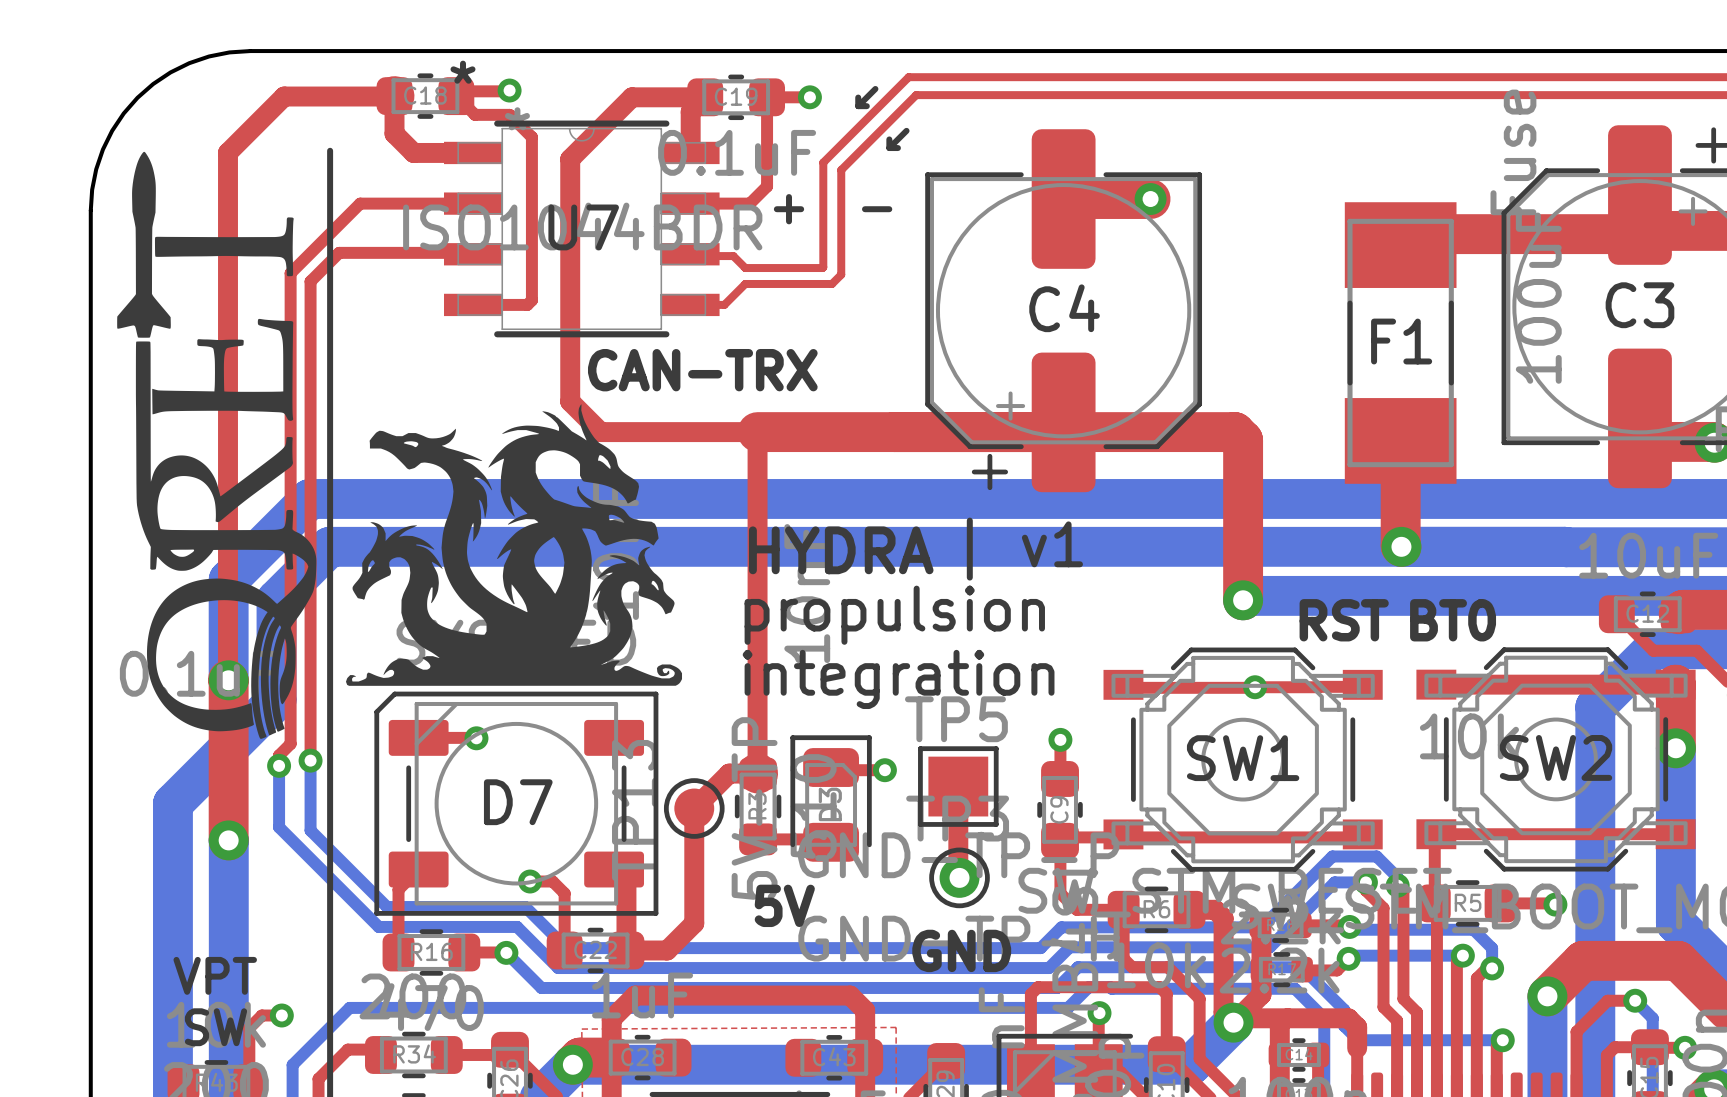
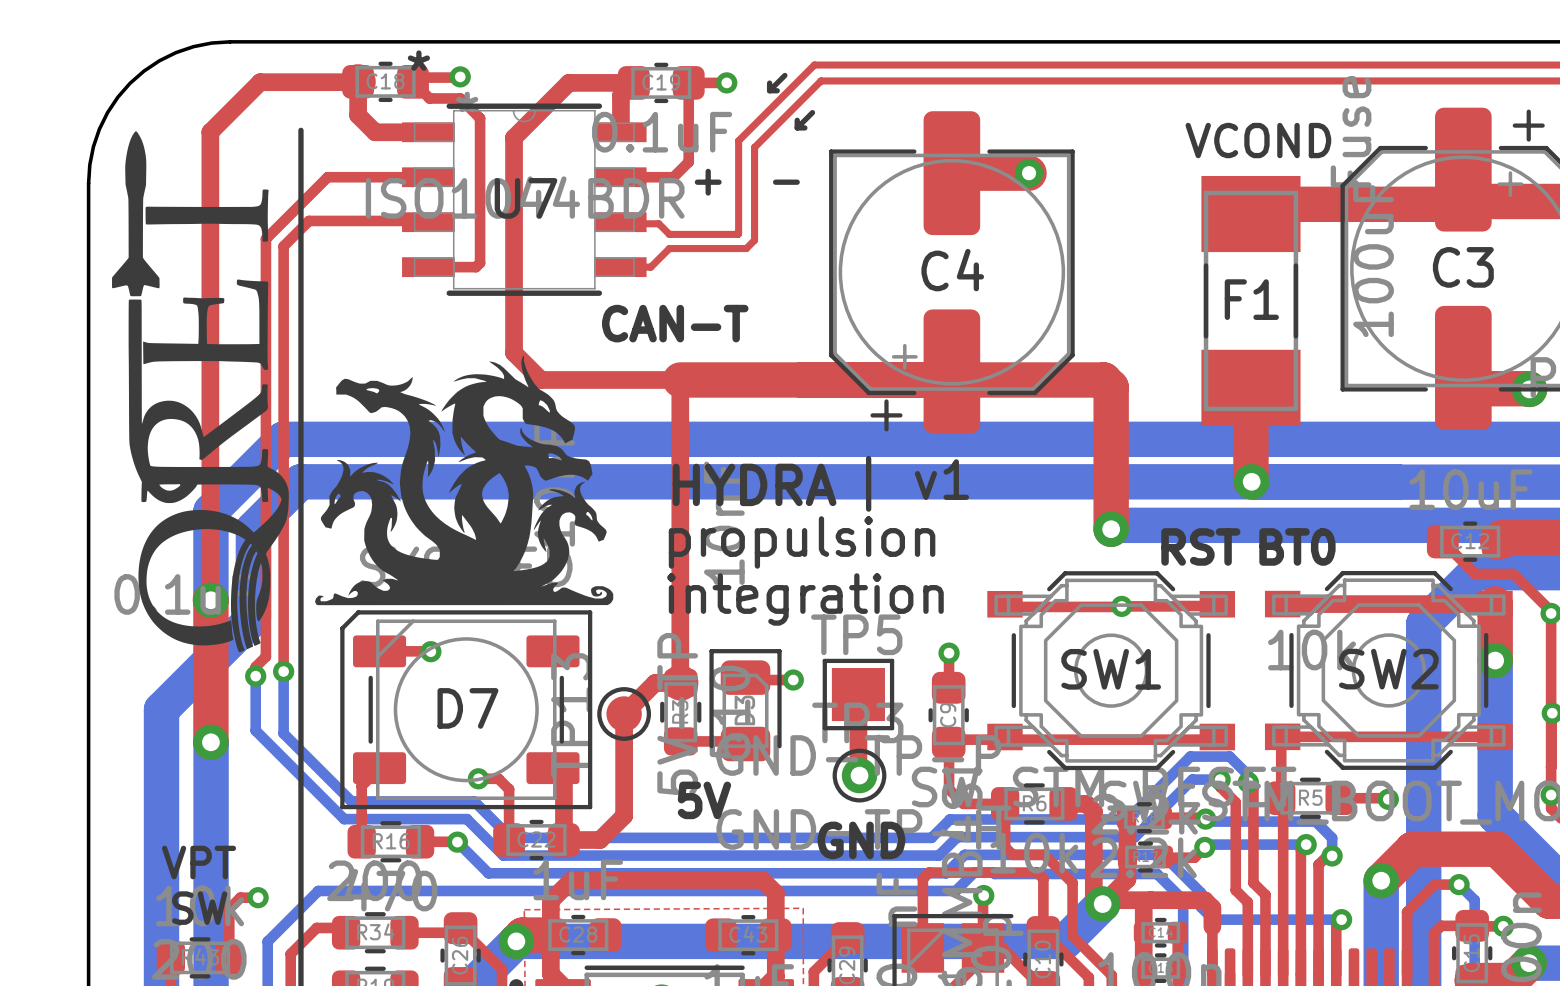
text: none -> VCOND (1258, 140)
text: CAN-TRX (702, 370) -> CAN-T (675, 323)

